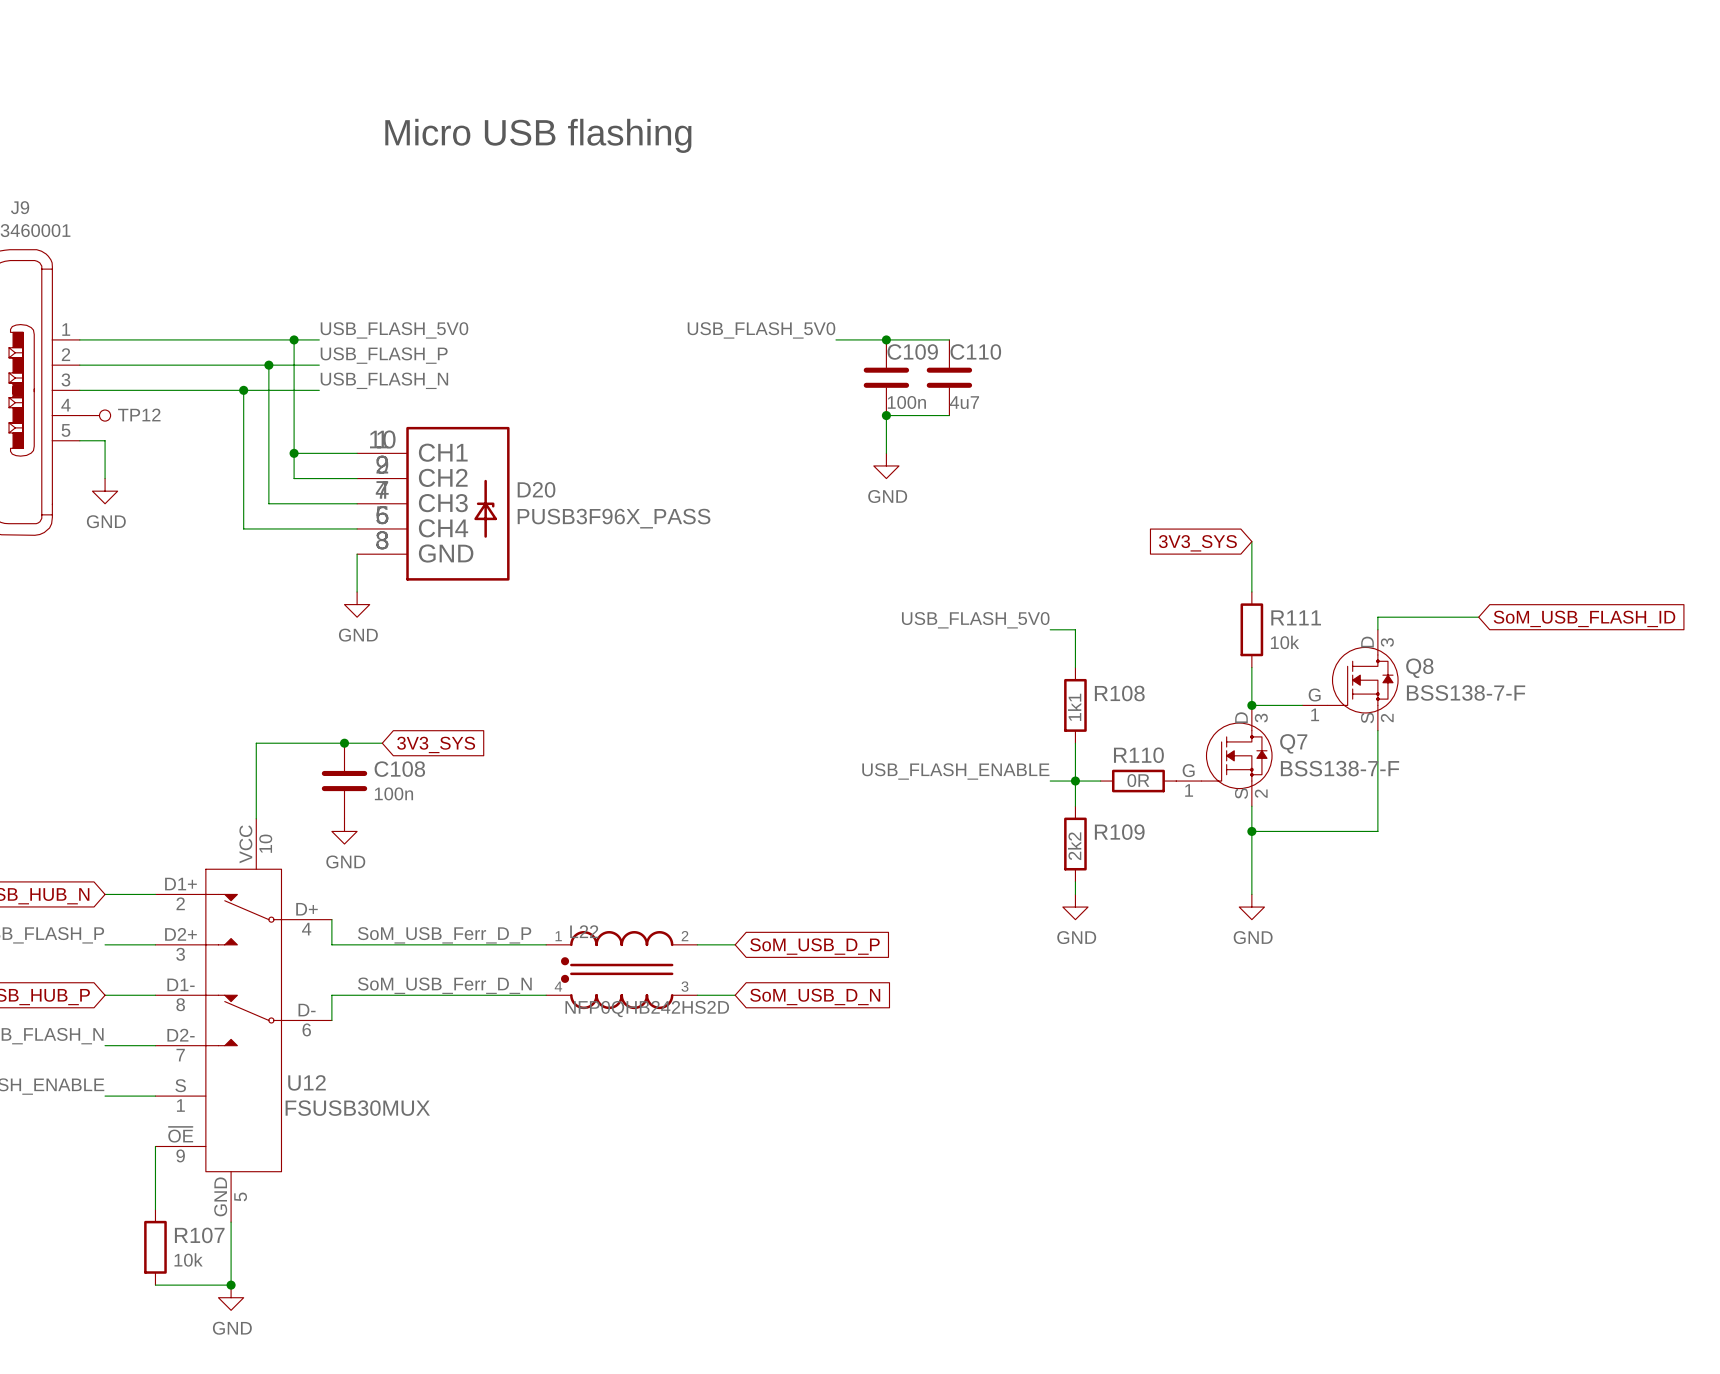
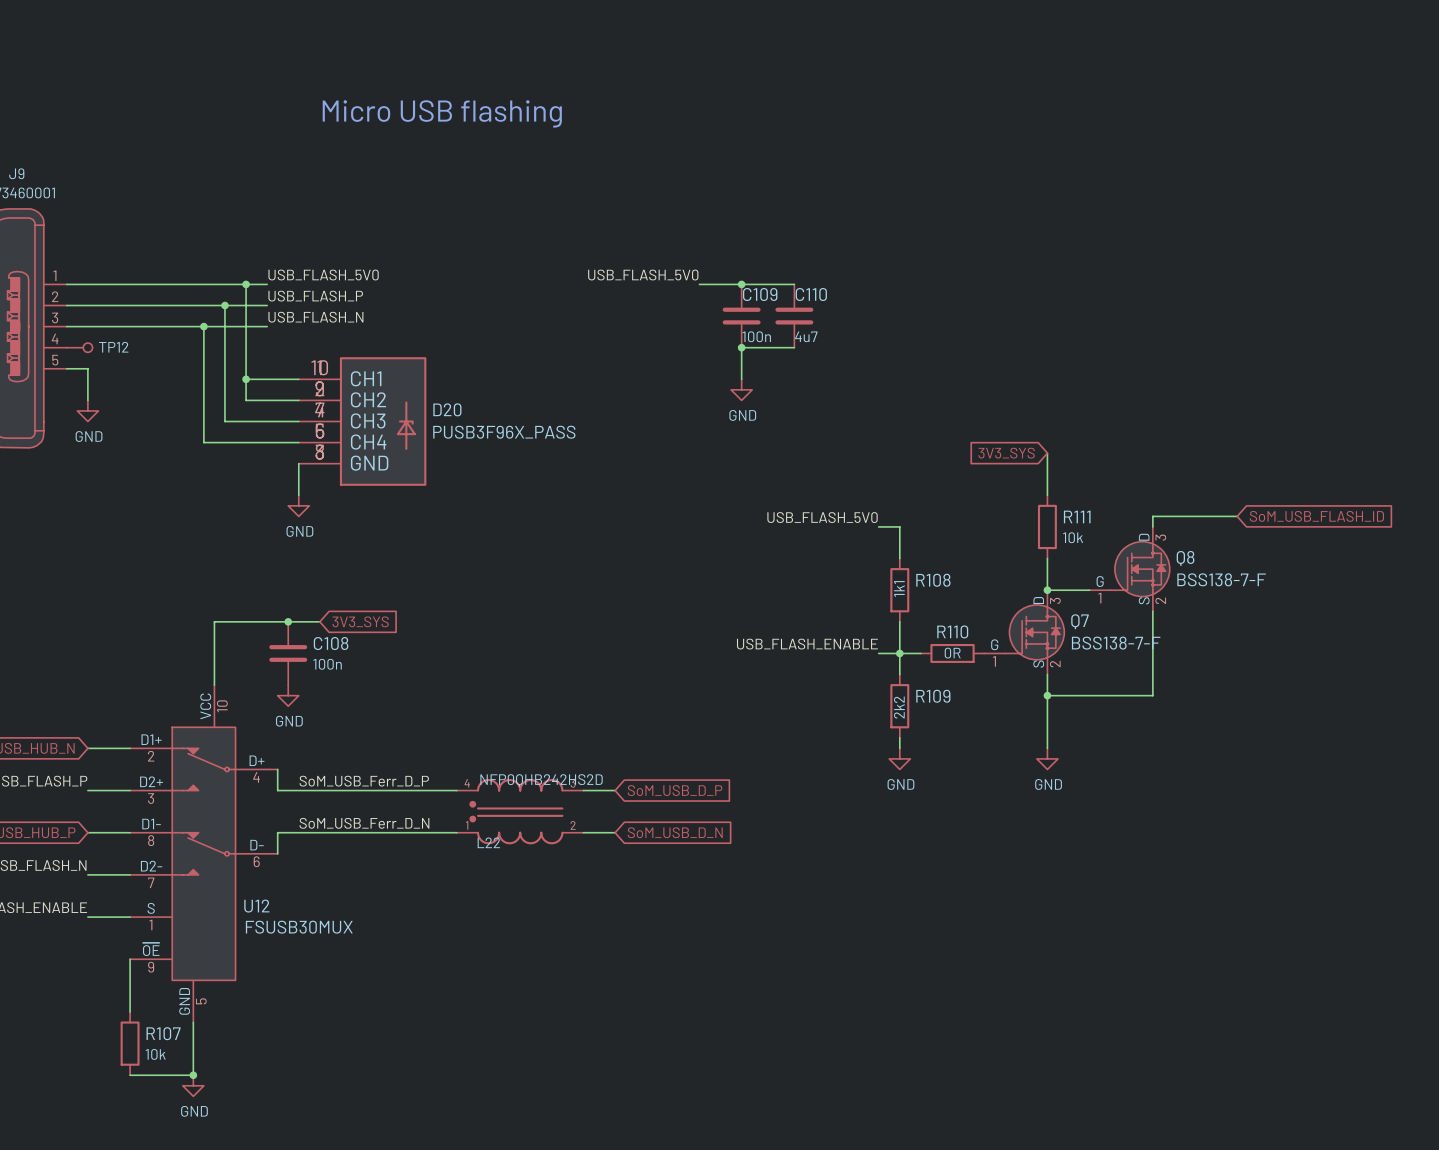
L22 flip: as is (617, 970) -> up-down (516, 811)

